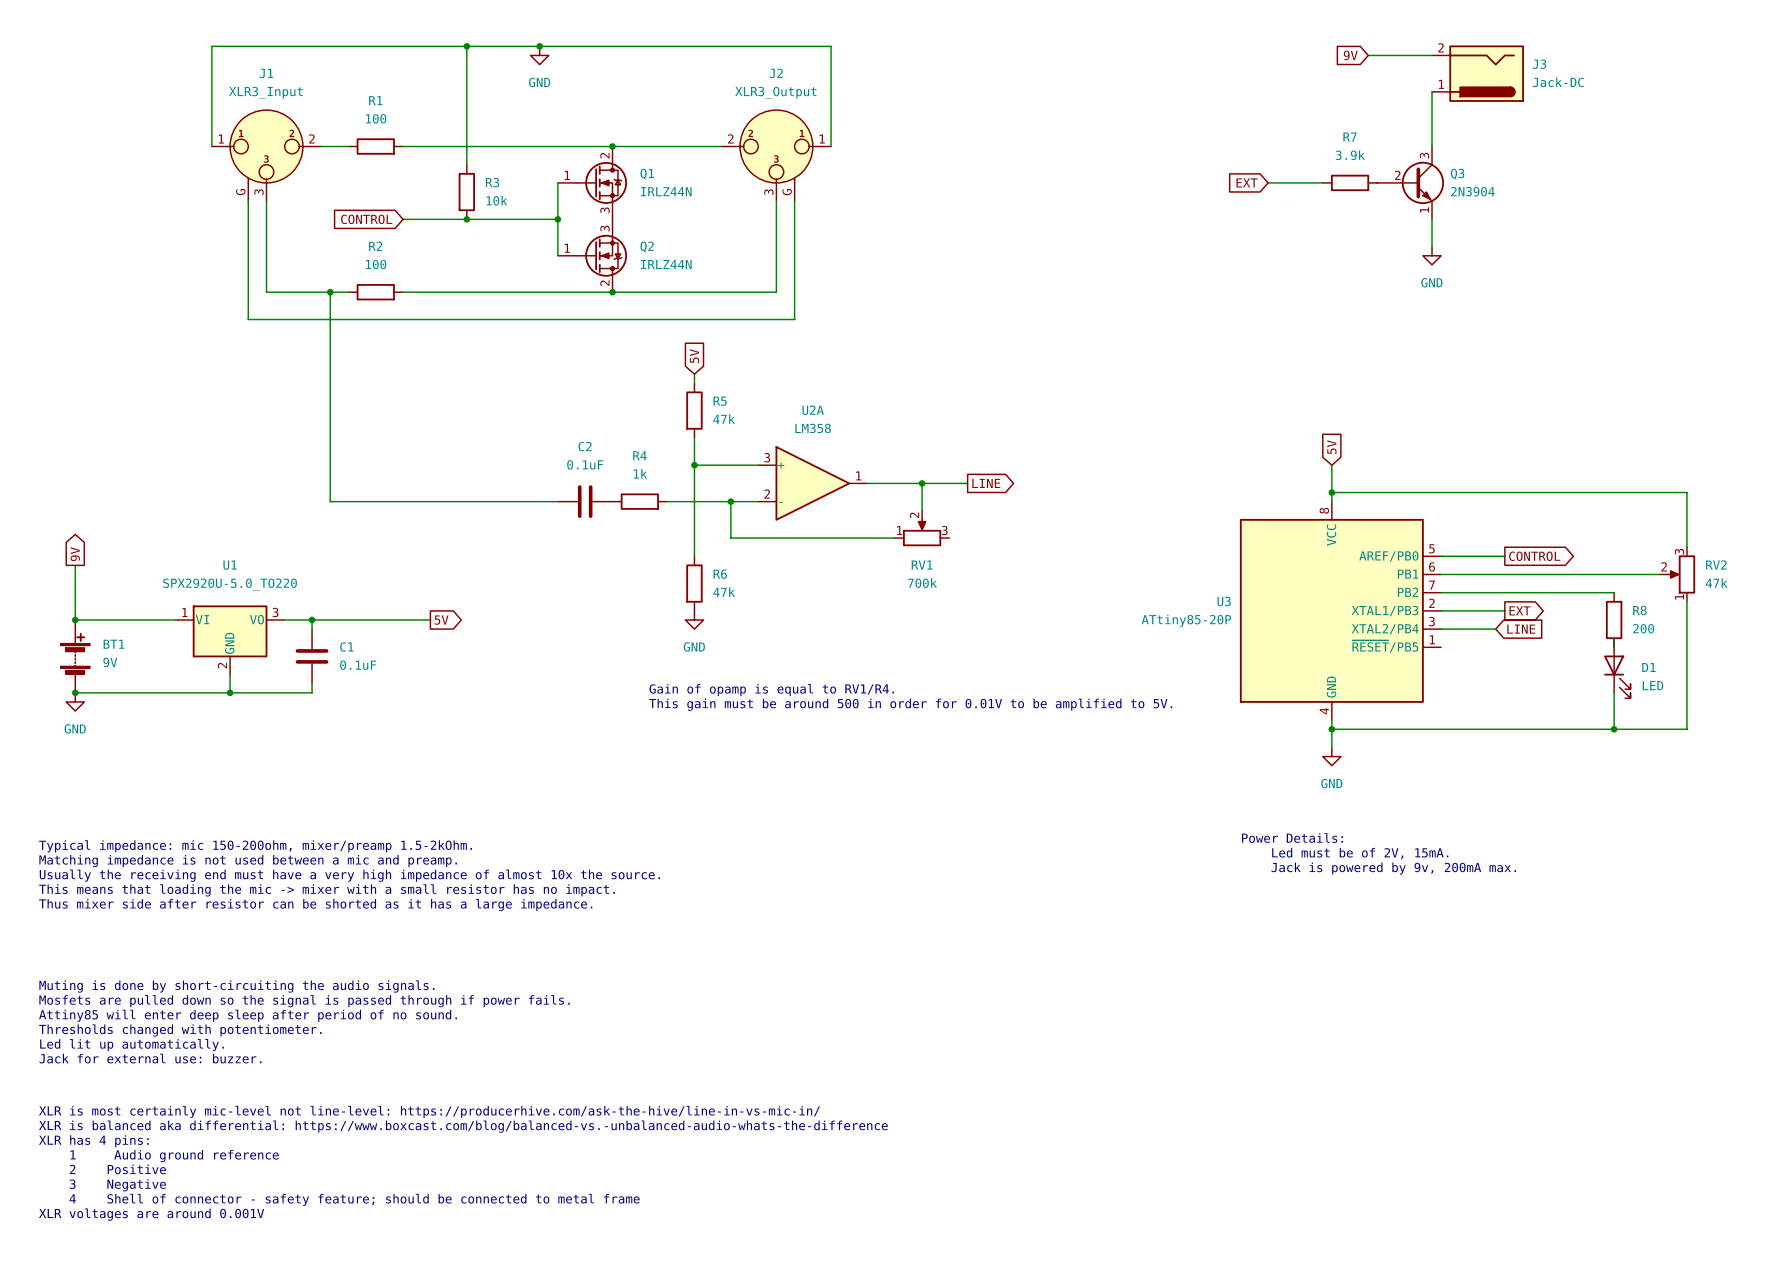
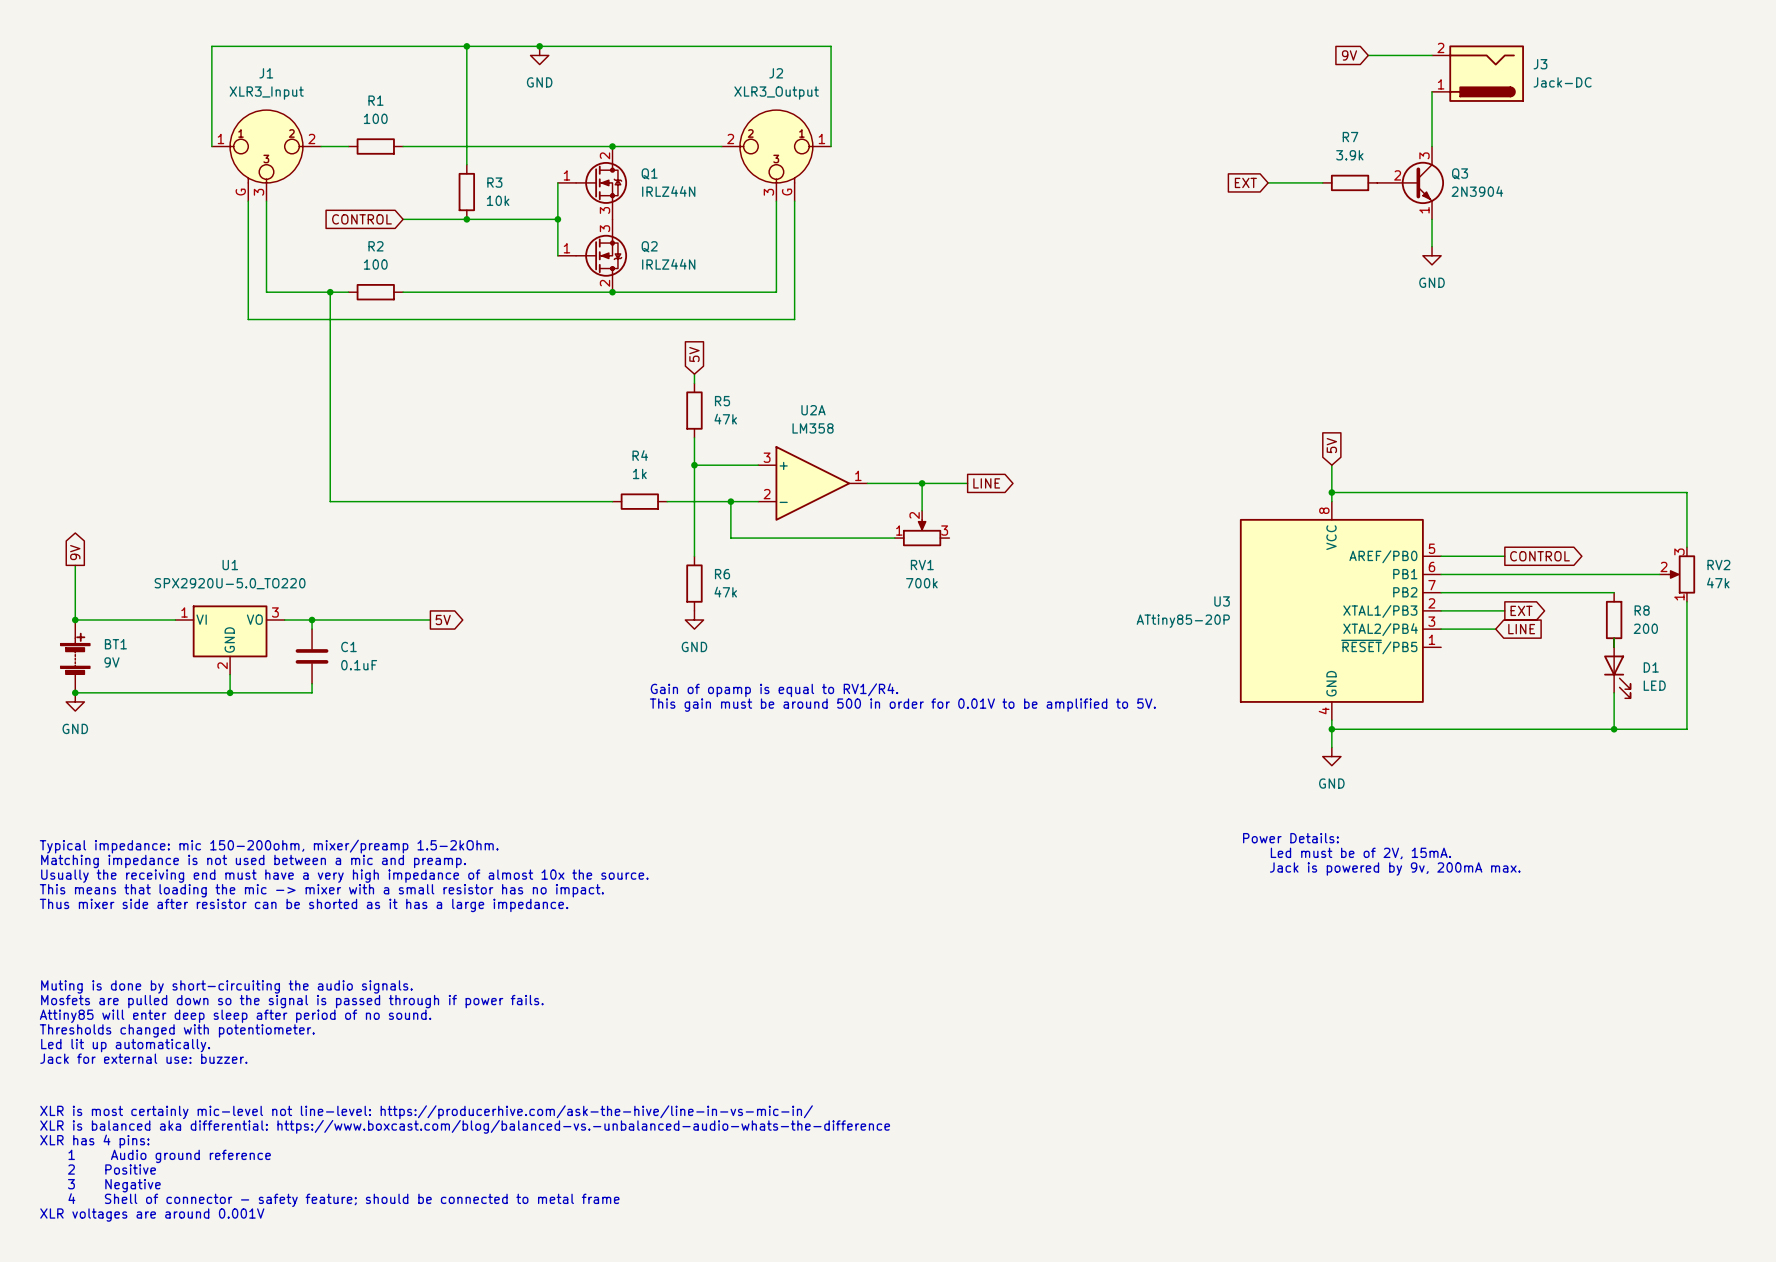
C2: 0.1uF (585, 501) -> none

